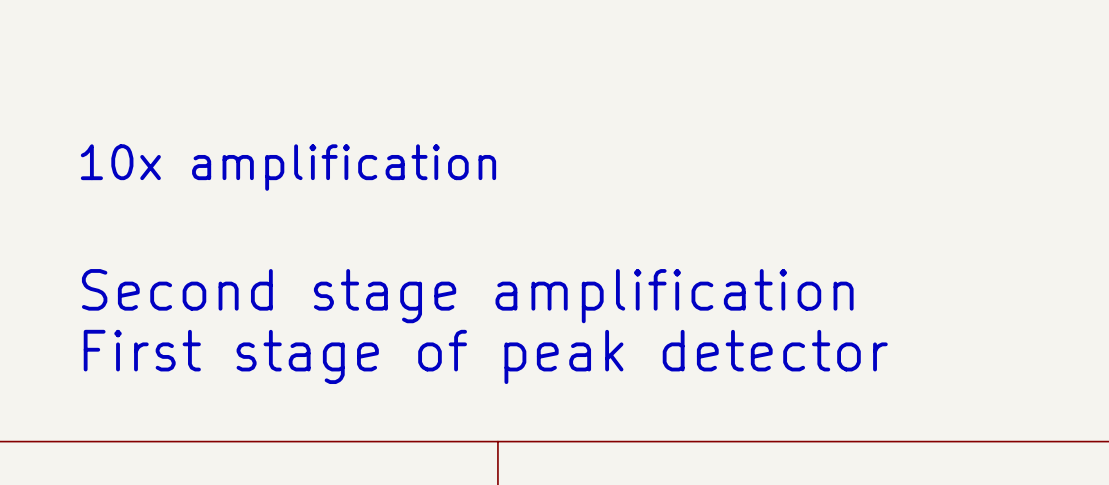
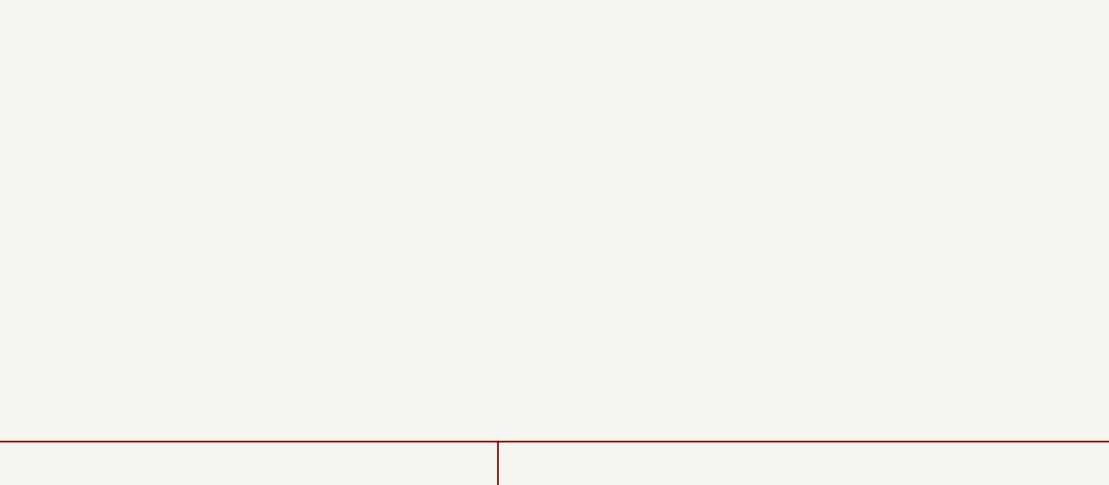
text: 10x amplification (288, 167) -> none
text: Second stage amplification (467, 296) -> none
text: First stage of peak detector (485, 356) -> none

